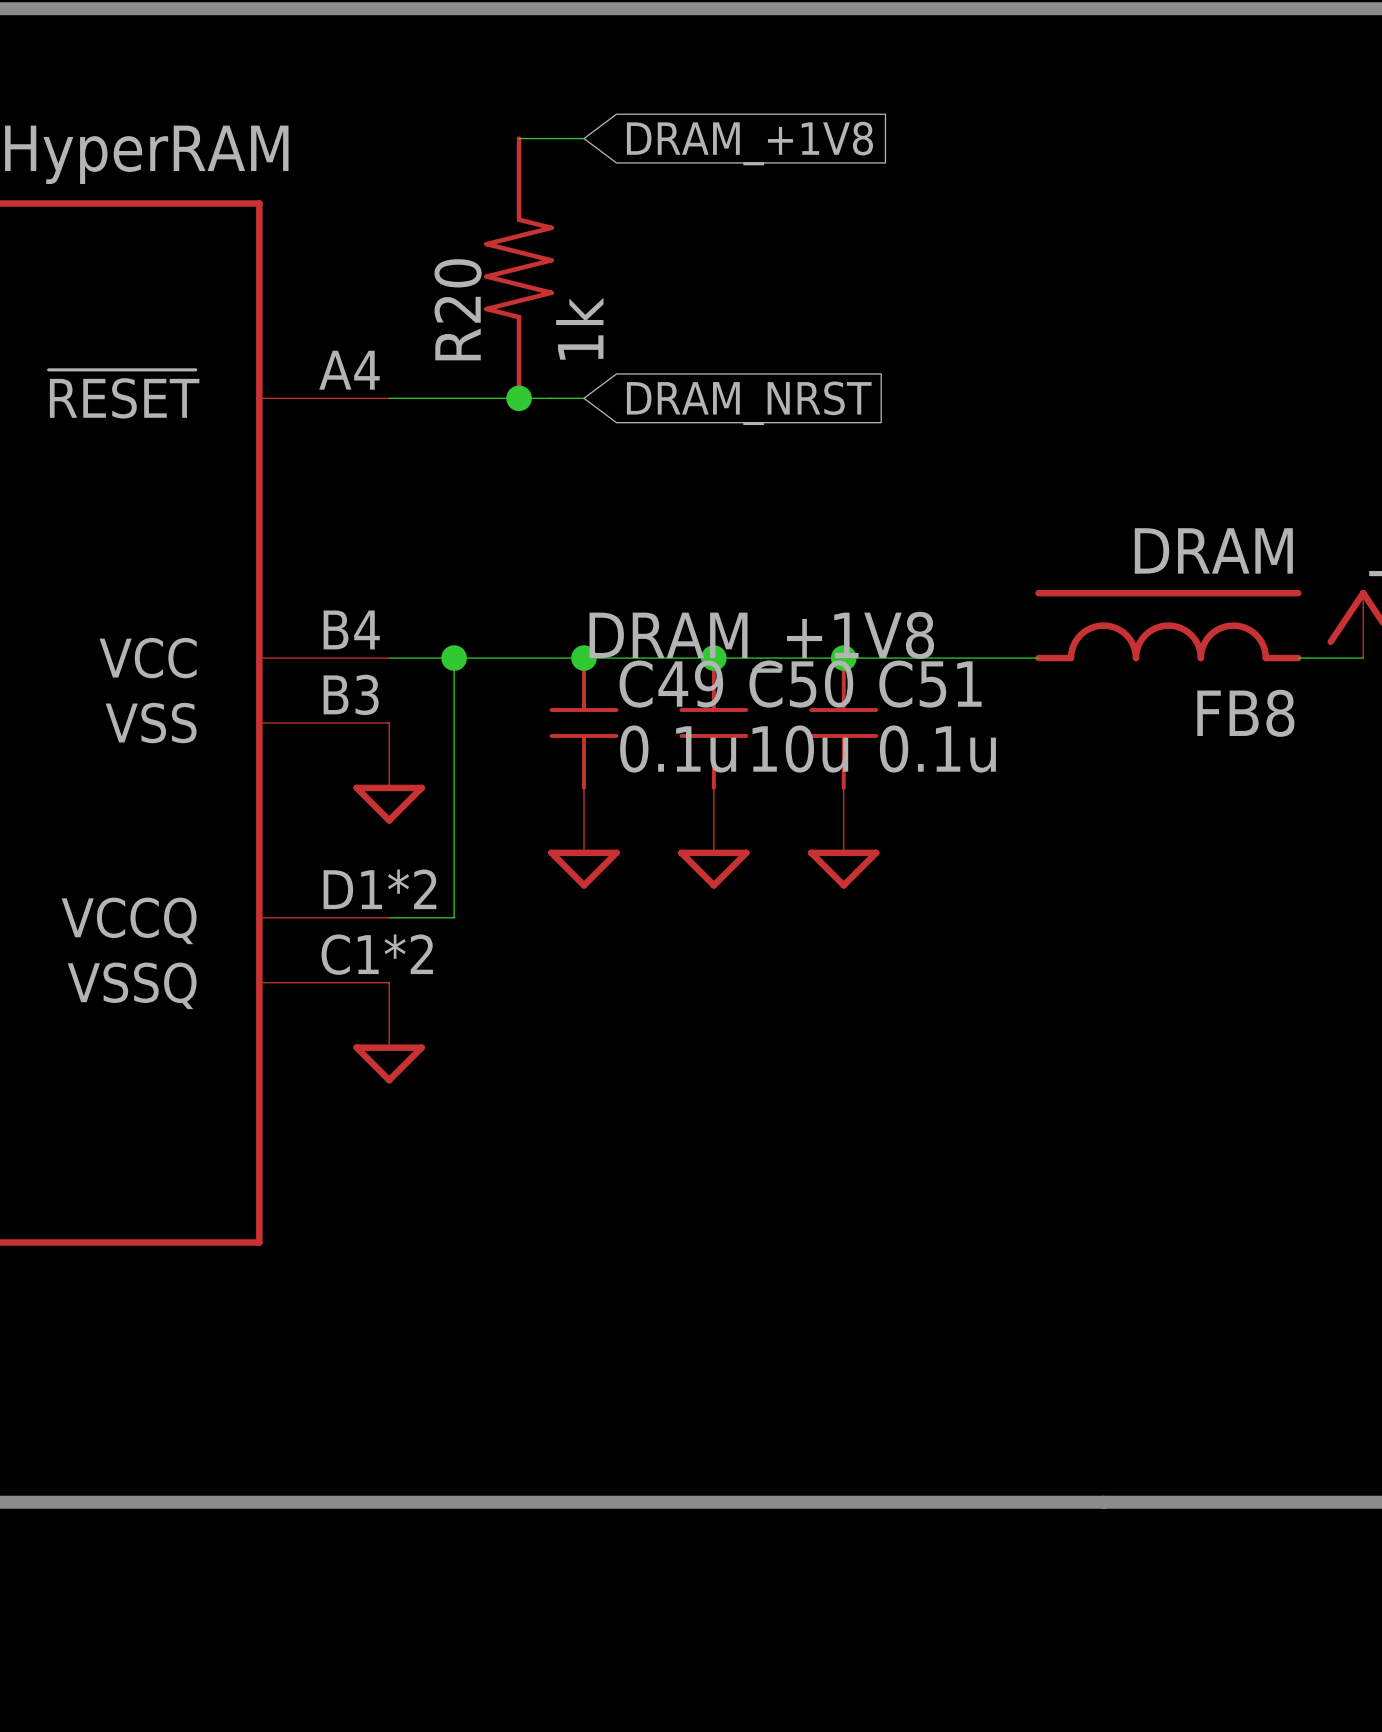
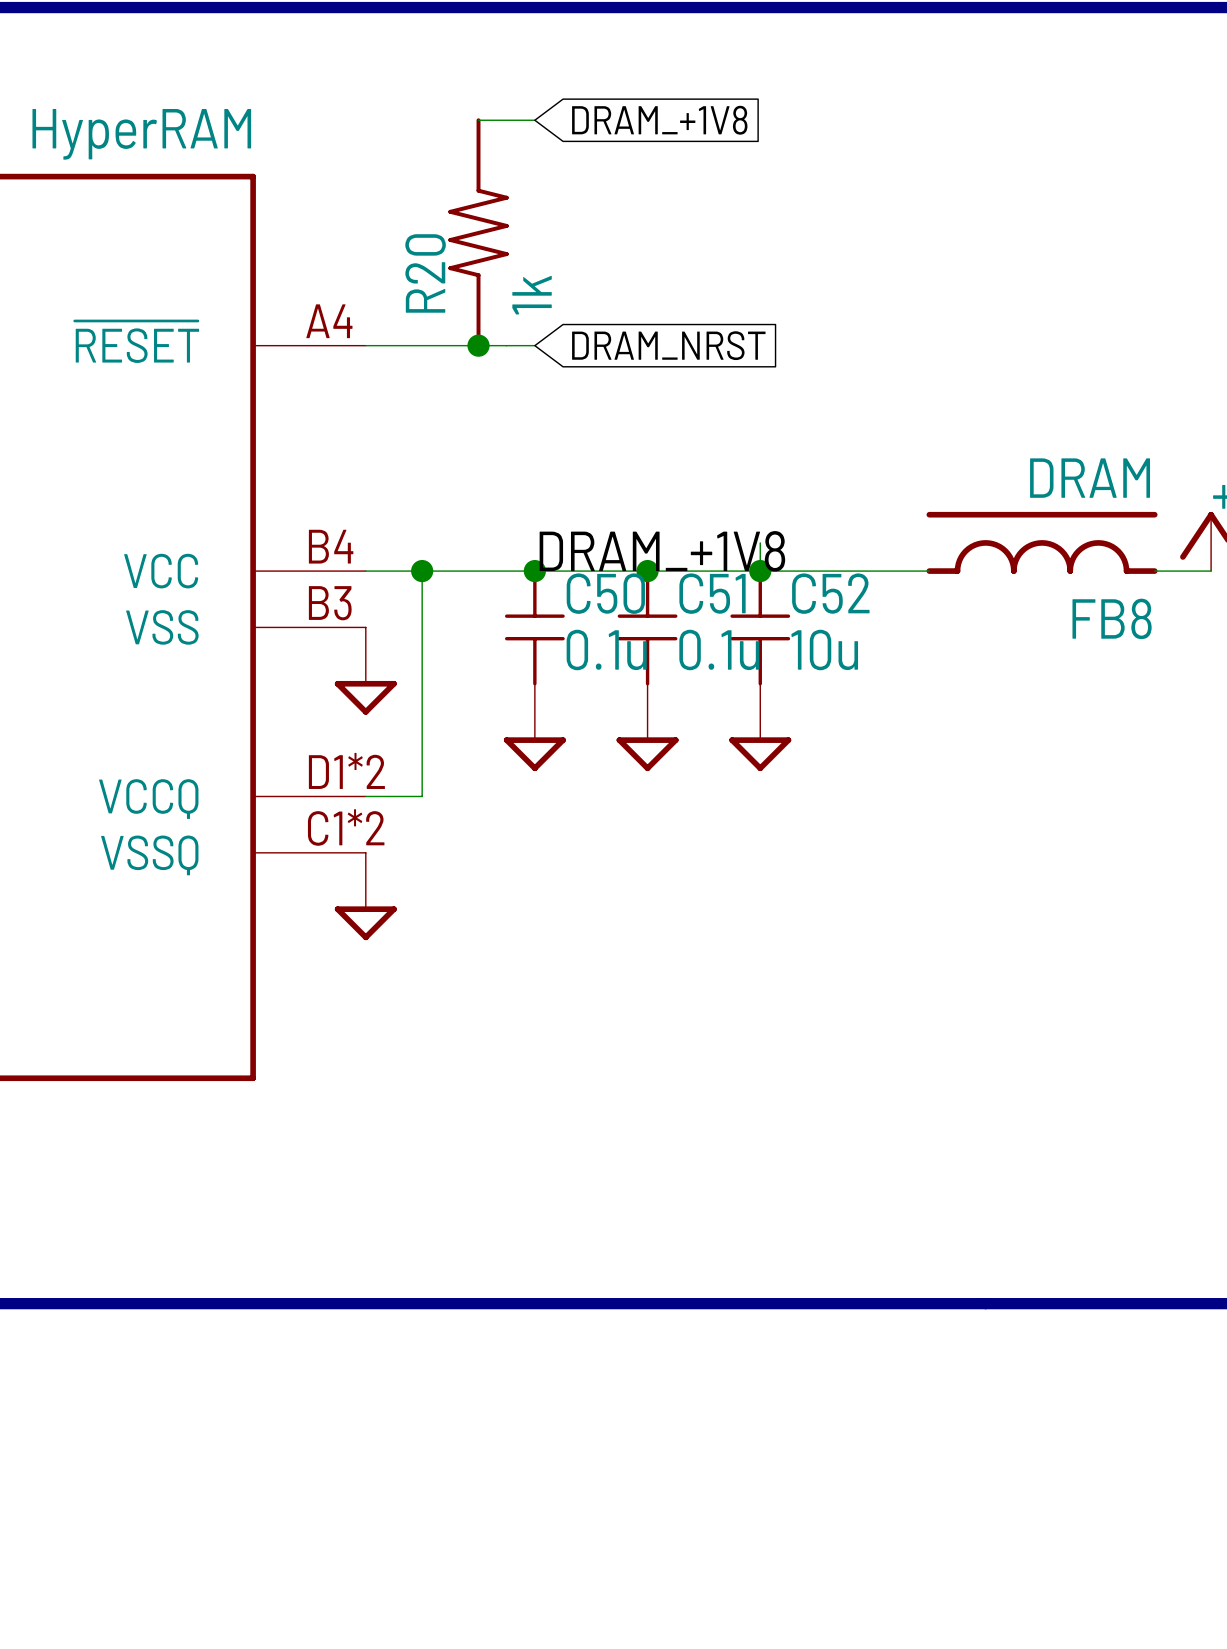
wire: none -> (760, 542) (760, 571)
C49 name: C49 (671, 684) -> C50 (605, 593)
C50 name: C50 (801, 684) -> C51 (712, 593)
C51 name: C51 (930, 684) -> C52 (830, 593)
C50 value: 10u (800, 749) -> 0.1u (719, 649)
C51 value: 0.1u (937, 749) -> 10u (824, 649)

